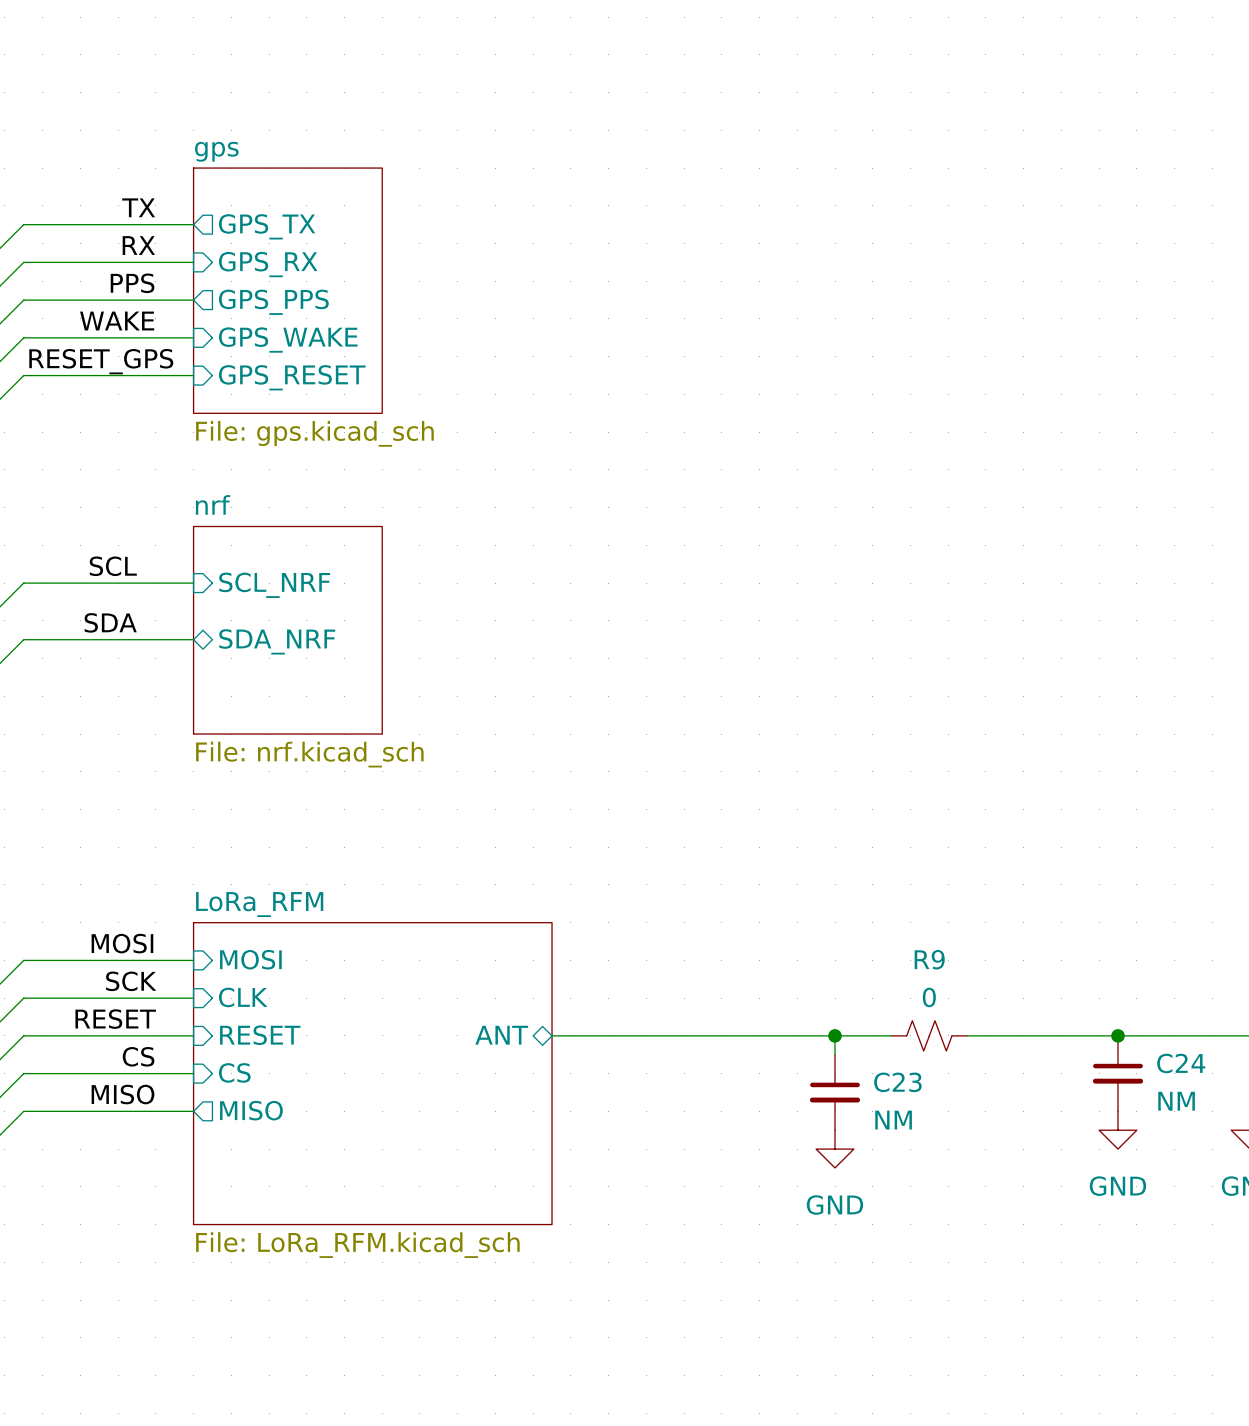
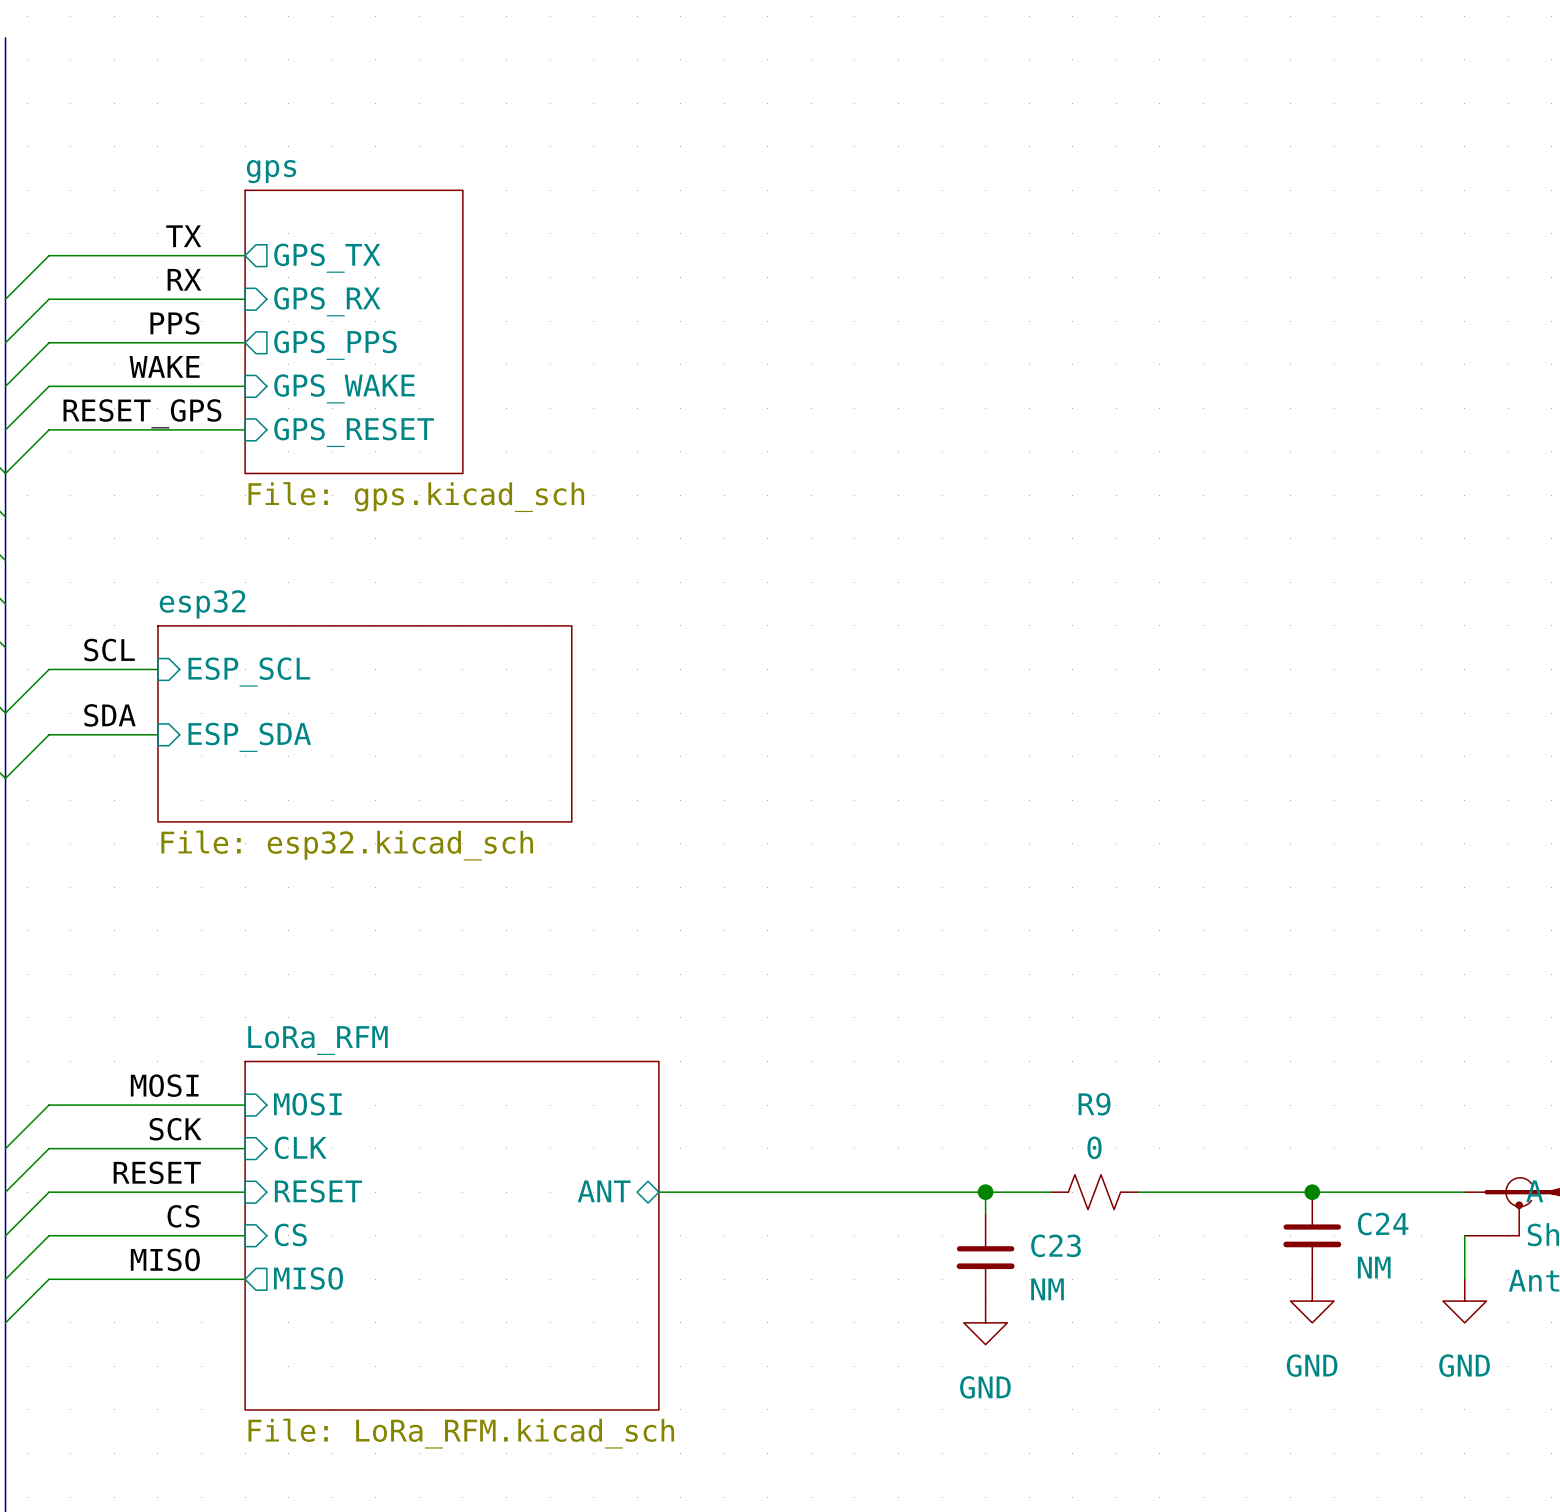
label position: SCL (113, 566) -> SCL (109, 650)
wire: (118, 583) (193, 583) -> none
sheet pin: none -> ESP_SCL (249, 671)
sheet pin: SCL_NRF (274, 585) -> none
label position: SDA (110, 622) -> SDA (109, 715)
sheet nrf: File: nrf.kicad_sch (287, 630) -> none
sheet esp32: none -> File: esp32.kicad_sch (364, 723)
wire: (118, 639) (193, 639) -> none
sheet pin: none -> ESP_SDA (249, 737)
sheet pin: SDA_NRF (277, 641) -> none

